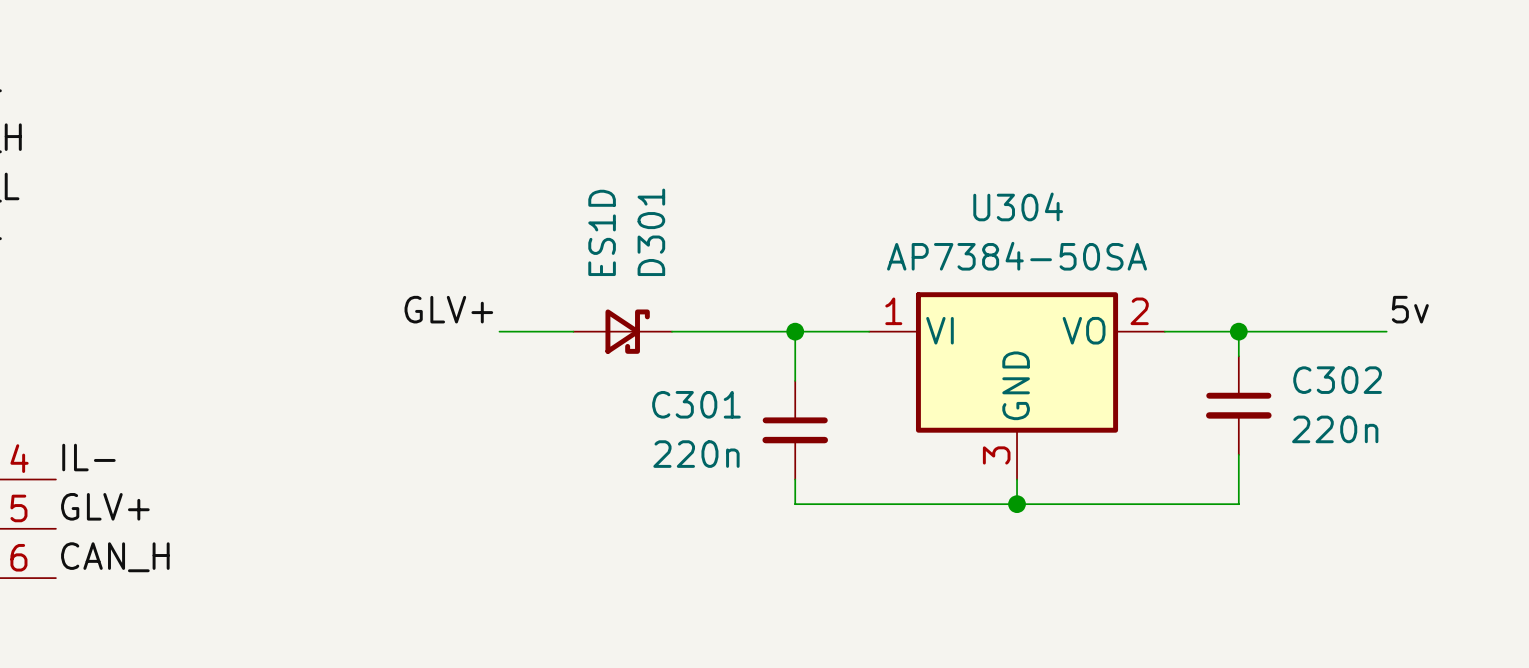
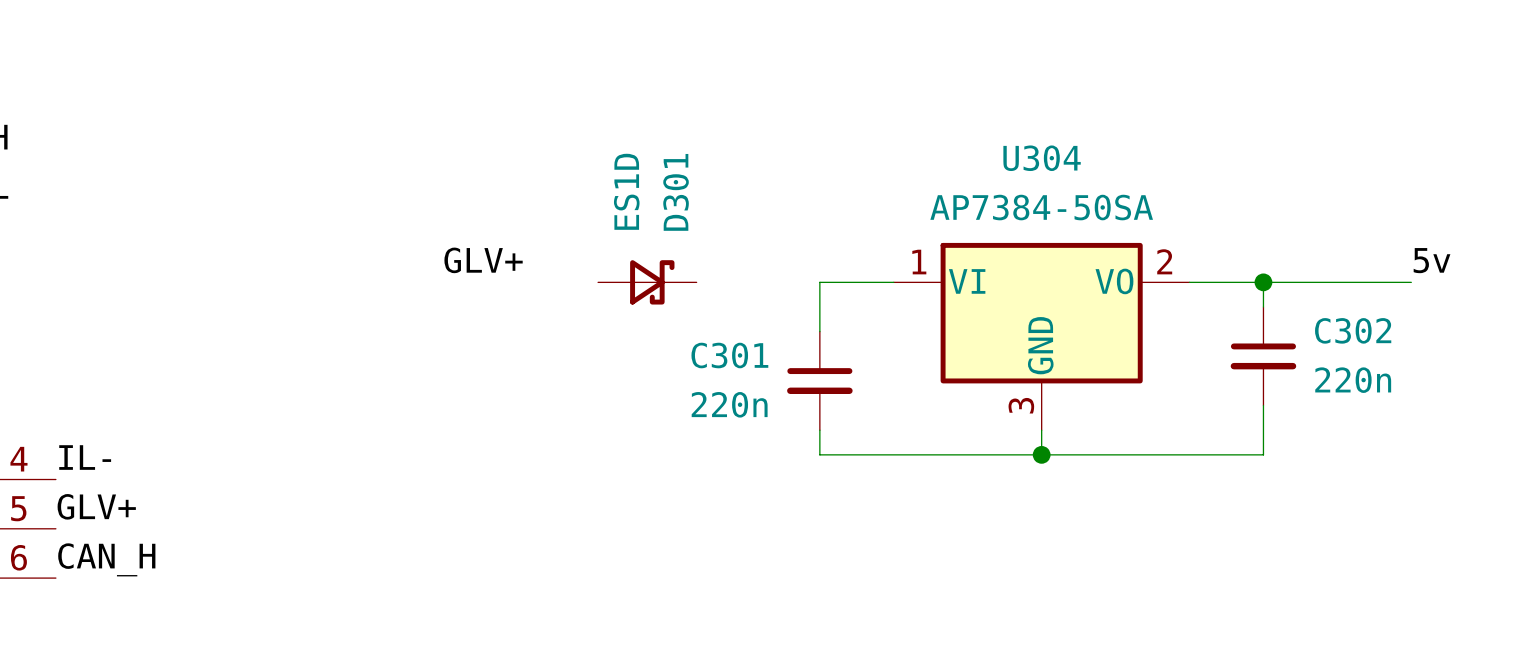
wire: none -> (893, 282) (819, 282) (819, 331)
label position: GLV+ (448, 309) -> GLV+ (483, 260)
label position: 5v (1410, 309) -> 5v (1432, 260)
wire: (499, 331) (573, 331) -> none
D301 position: (622, 331) -> (647, 282)
wire: (672, 331) (869, 331) -> none
wire: (795, 331) (795, 380) -> none
junction: (795, 331) -> none
wire: (1164, 331) (1386, 331) -> (1189, 282) (1411, 282)
wire: (1238, 331) (1238, 356) -> (1263, 282) (1263, 307)
junction position: (1238, 331) -> (1263, 282)
U304 position: (1017, 385) -> (1041, 336)
C302 position: (1238, 405) -> (1263, 356)
C301 position: (795, 430) -> (819, 380)
wire: (1238, 454) (1238, 504) (795, 504) (795, 479) -> (1263, 405) (1263, 454) (819, 454) (819, 430)
wire: (1017, 479) (1017, 504) -> (1041, 430) (1041, 454)
junction position: (1017, 504) -> (1041, 454)

